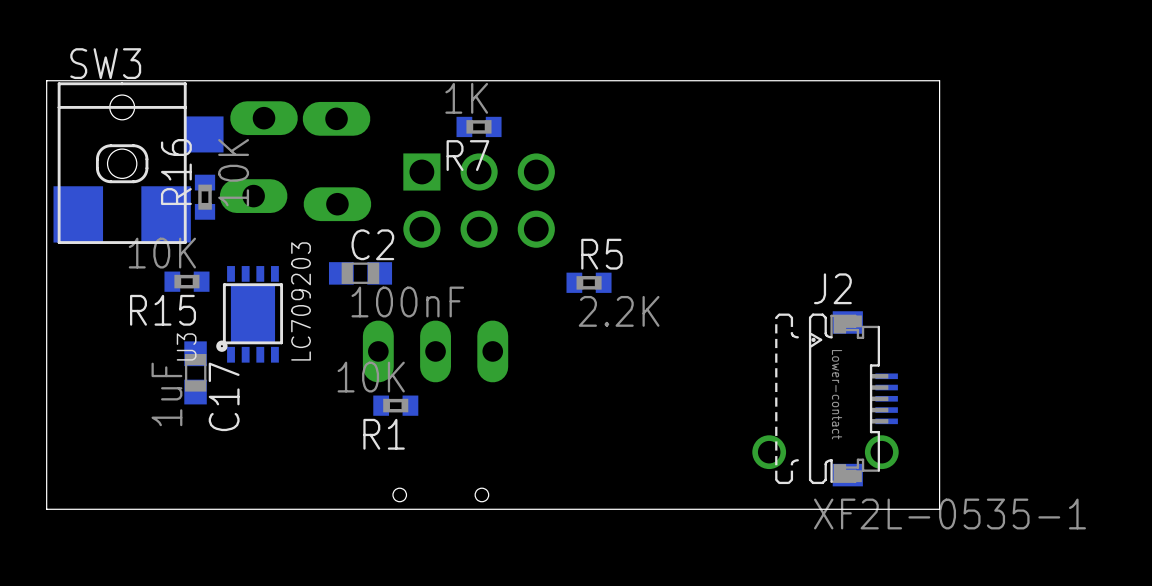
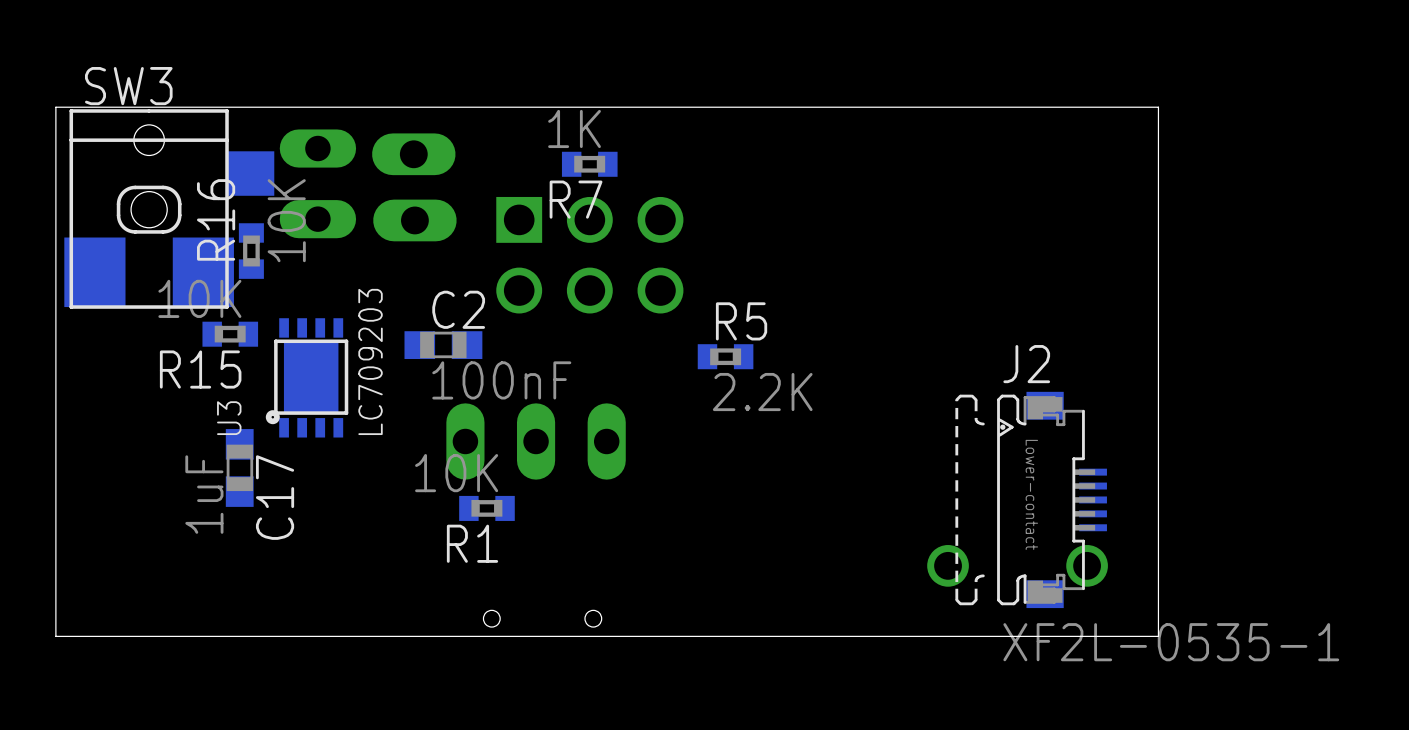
part: (264, 118) -> none
part: none -> (317, 183)
part: (253, 196) -> none
part position: (337, 204) -> (414, 220)
R15 position: (186, 281) -> (230, 334)
U3 position: (249, 314) -> (307, 377)

